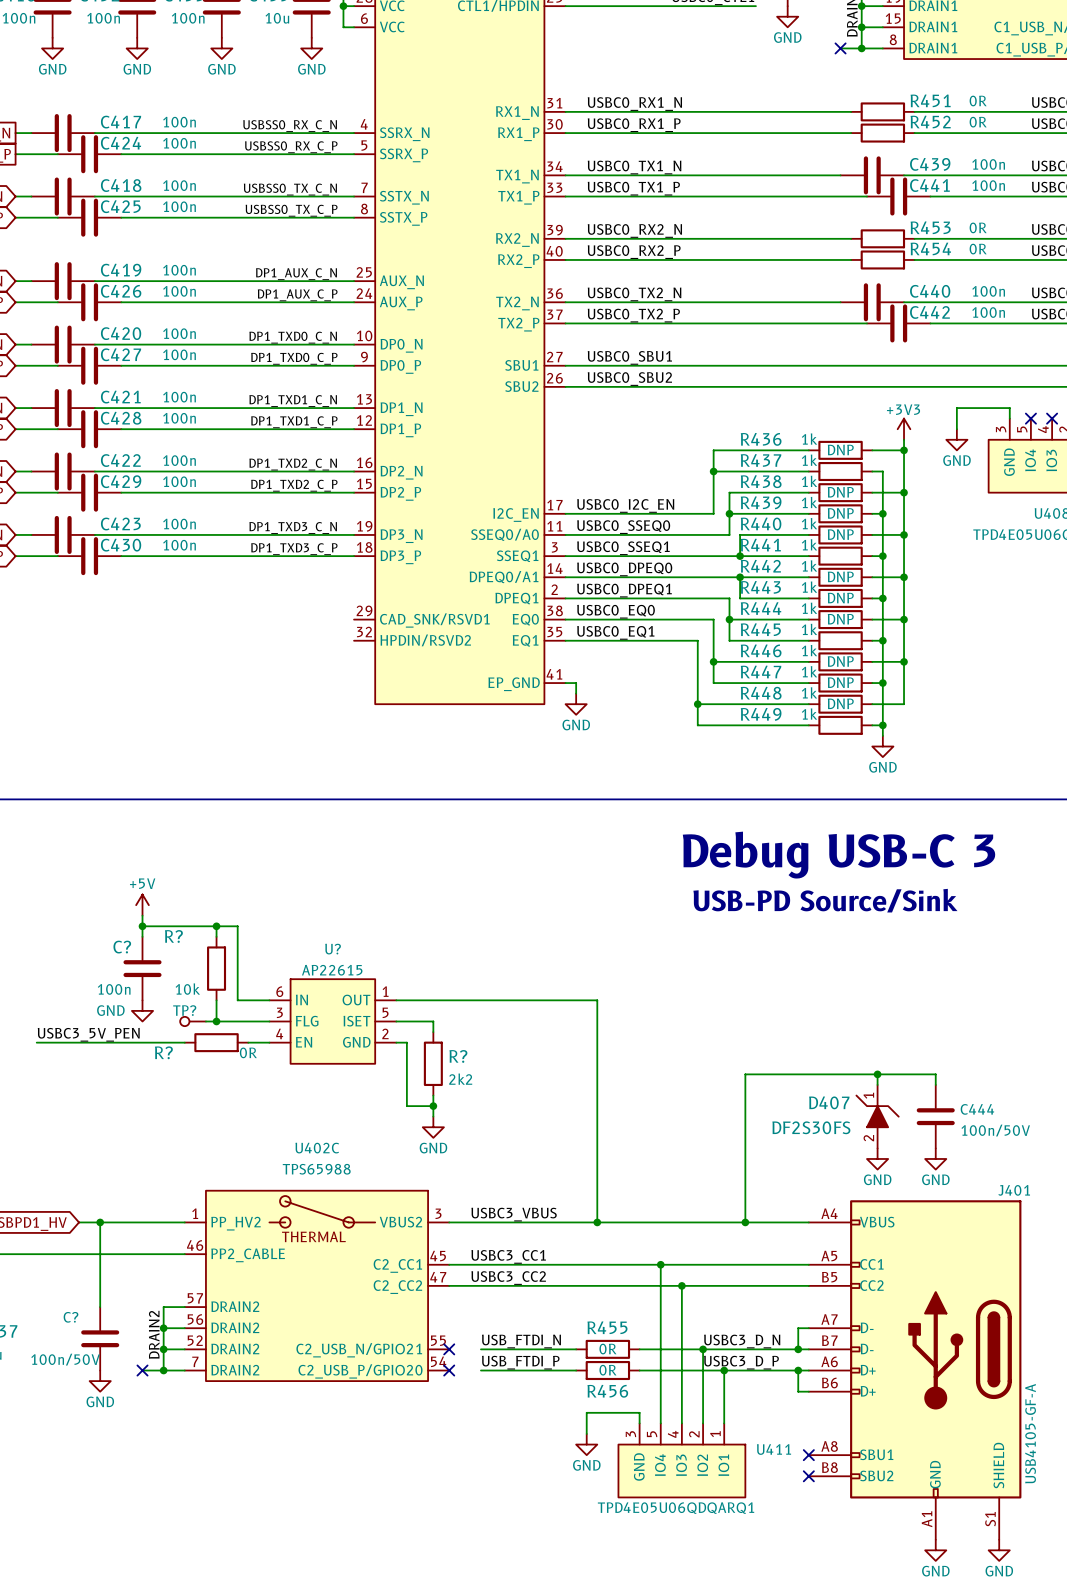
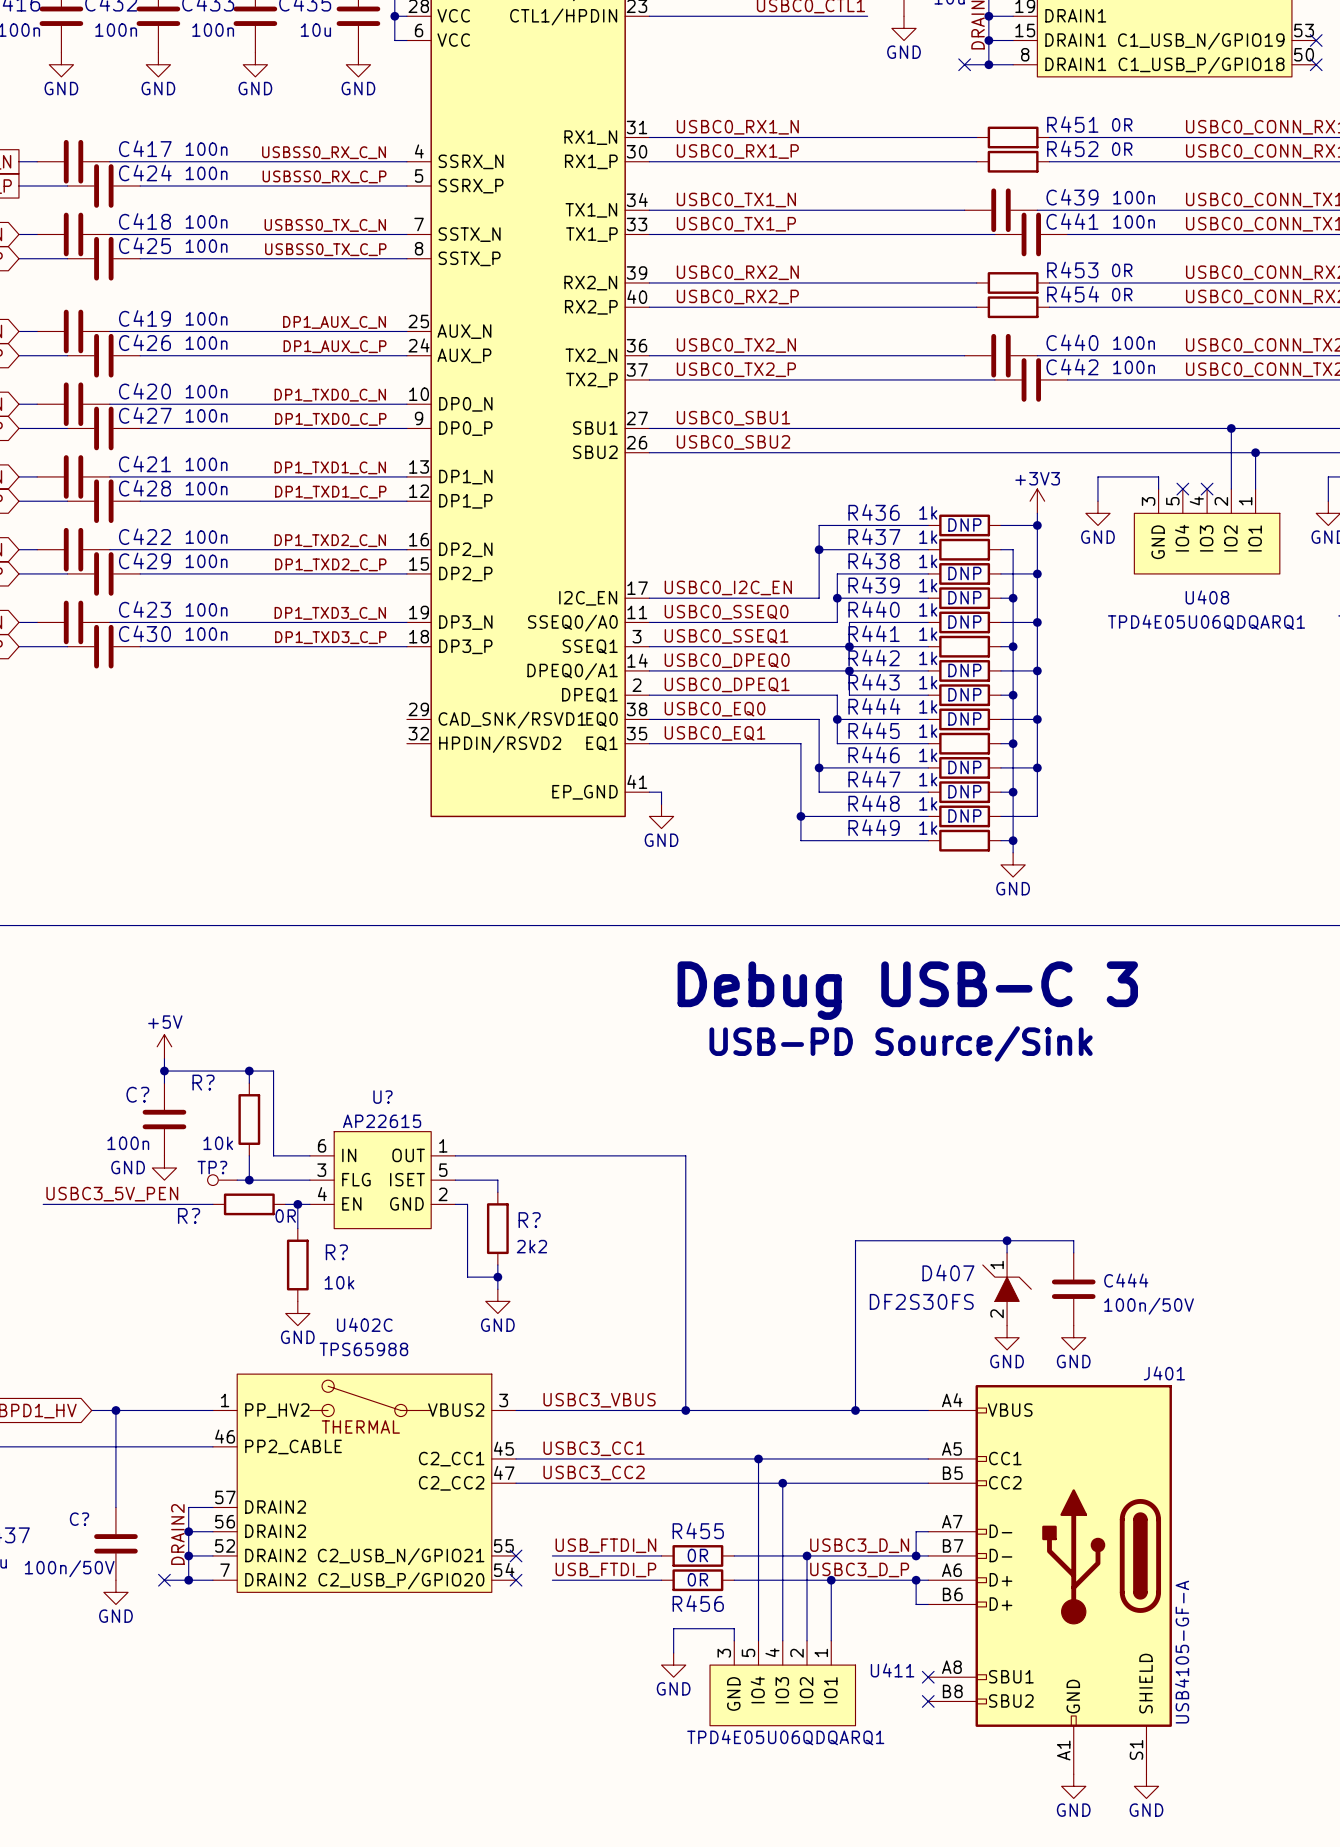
wire: none -> (297, 1204) (297, 1228)
junction: none -> (297, 1204)
R?: none -> (297, 1265)
power symbol: none -> GND (297, 1313)

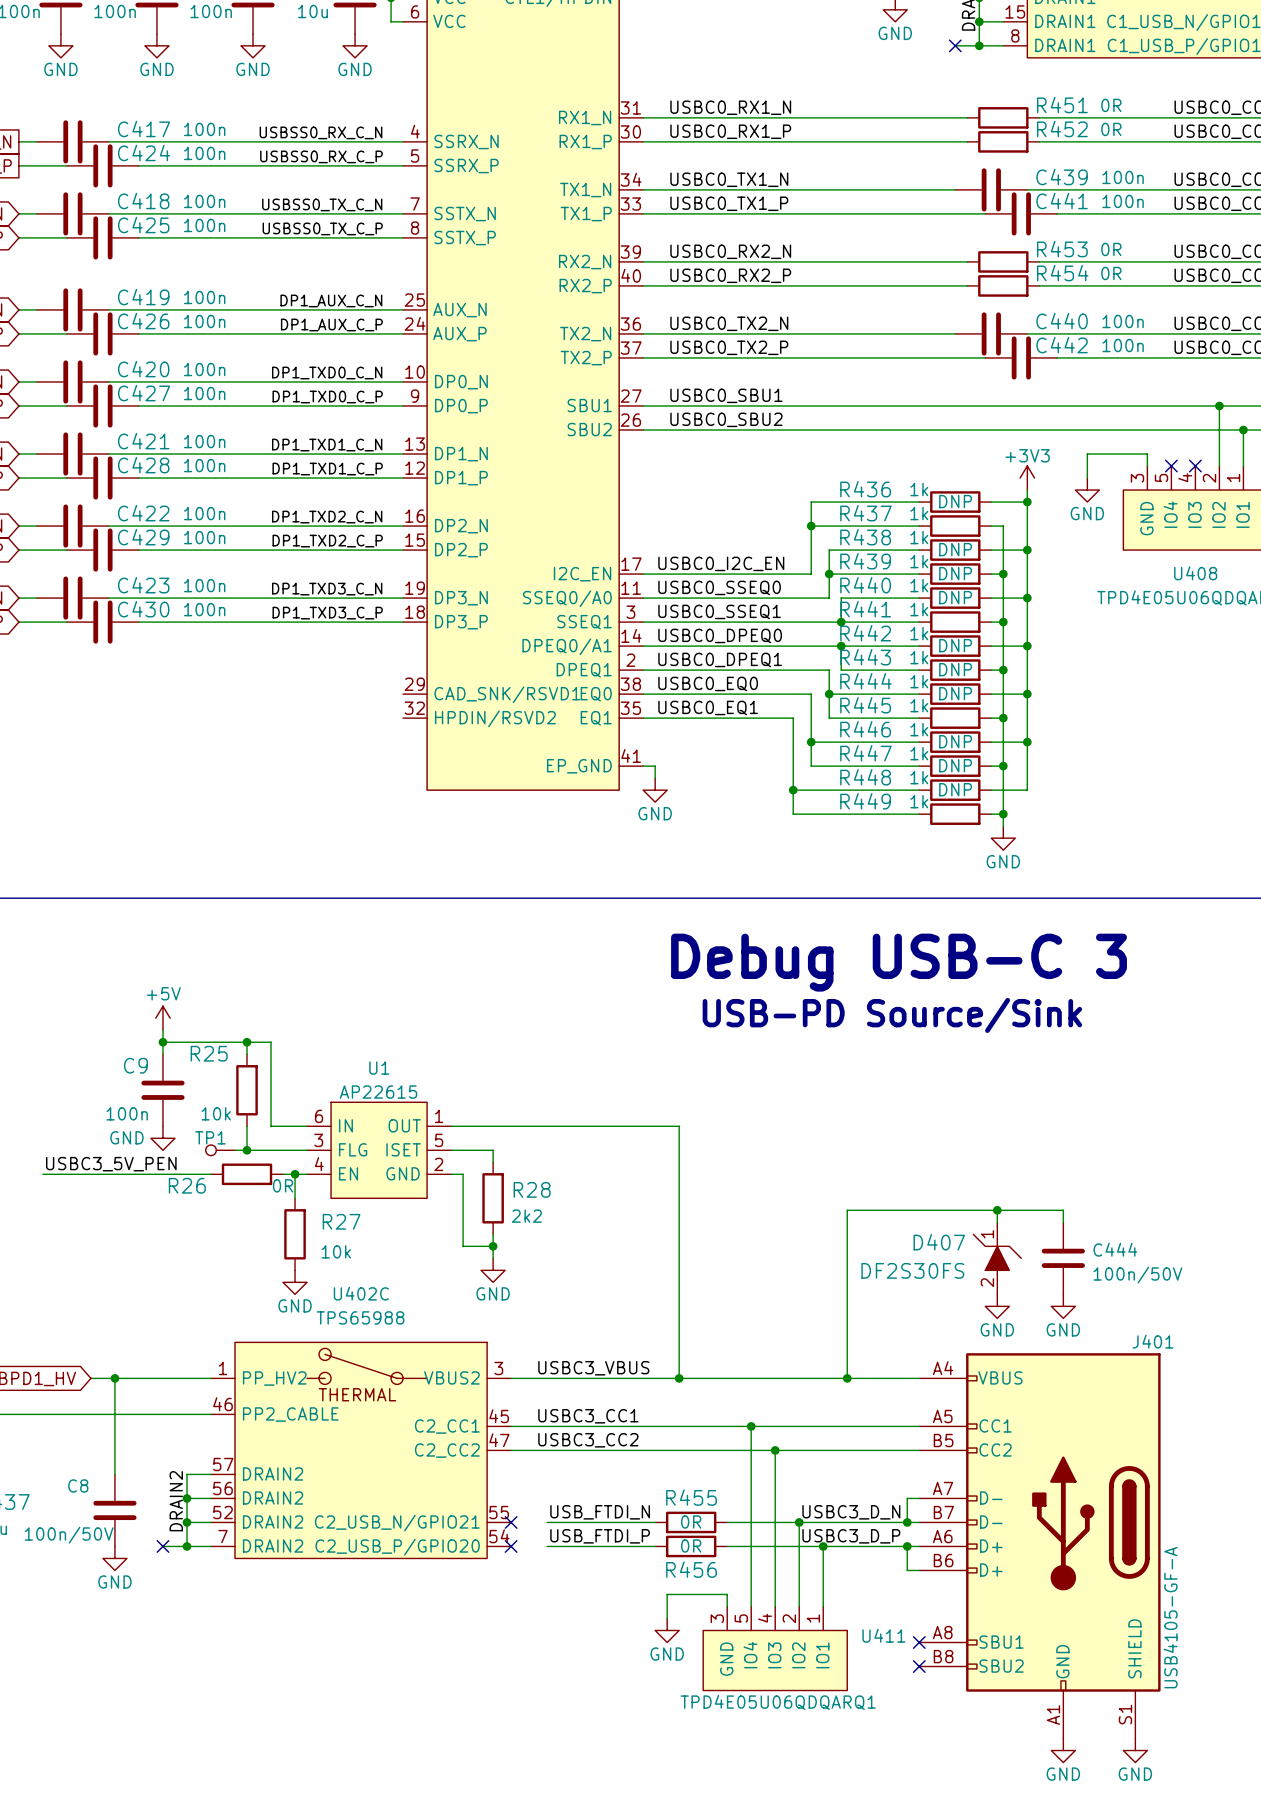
R? name: R? (203, 1082) -> R25 (209, 1053)
C? name: C? (137, 1094) -> C9 (135, 1065)
U? name: U? (382, 1097) -> U1 (379, 1068)
TP? name: TP? (212, 1167) -> TP1 (210, 1137)
R? name: R? (189, 1215) -> R26 (187, 1185)
R? name: R? (529, 1220) -> R28 (532, 1189)
R? name: R? (336, 1252) -> R27 (341, 1221)
C? name: C? (79, 1519) -> C8 (78, 1485)

